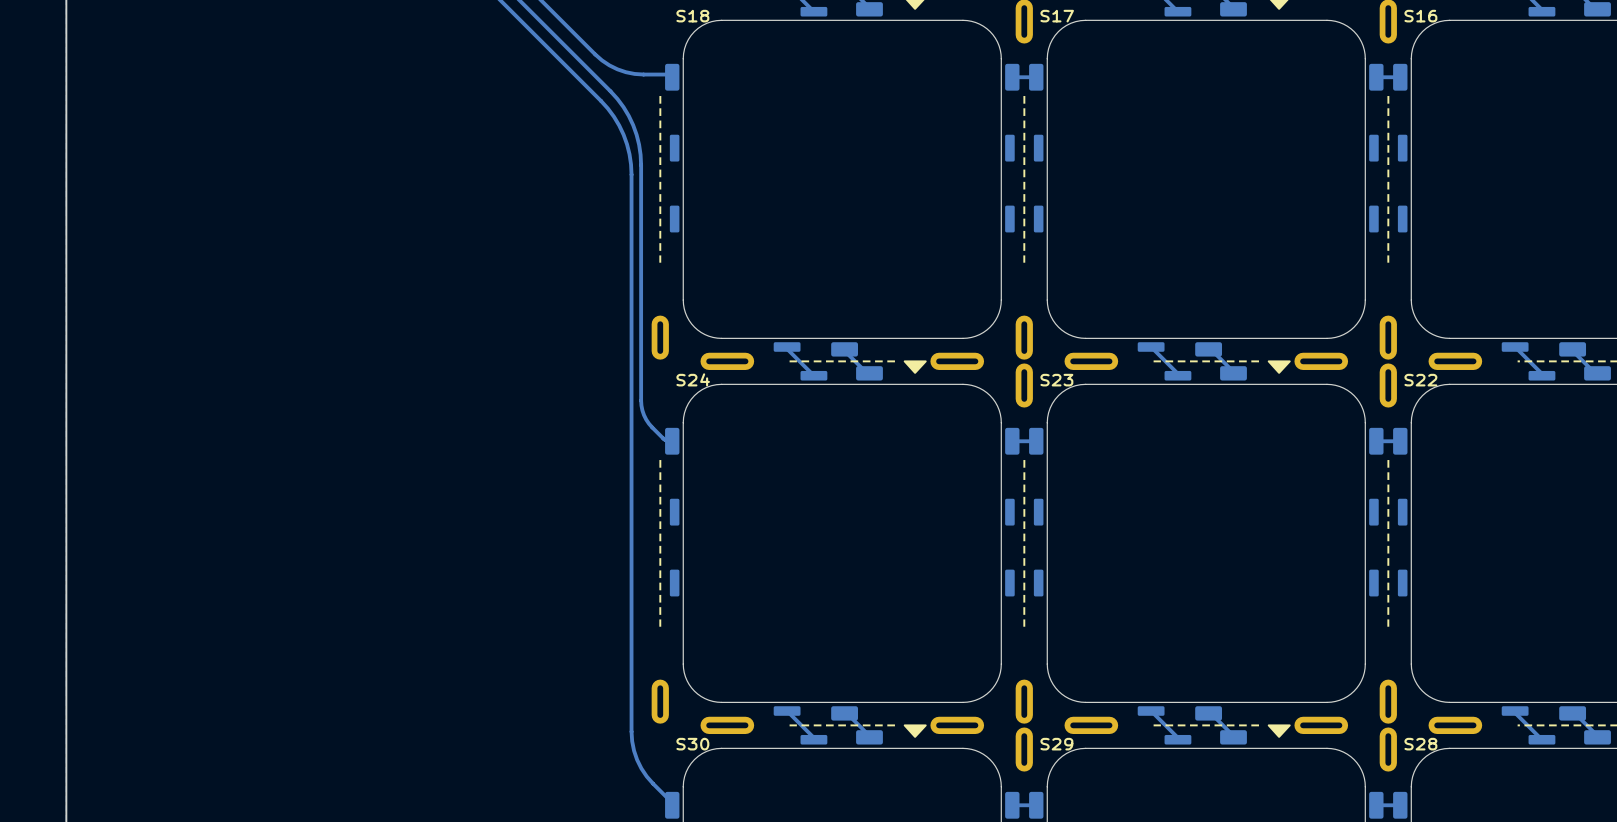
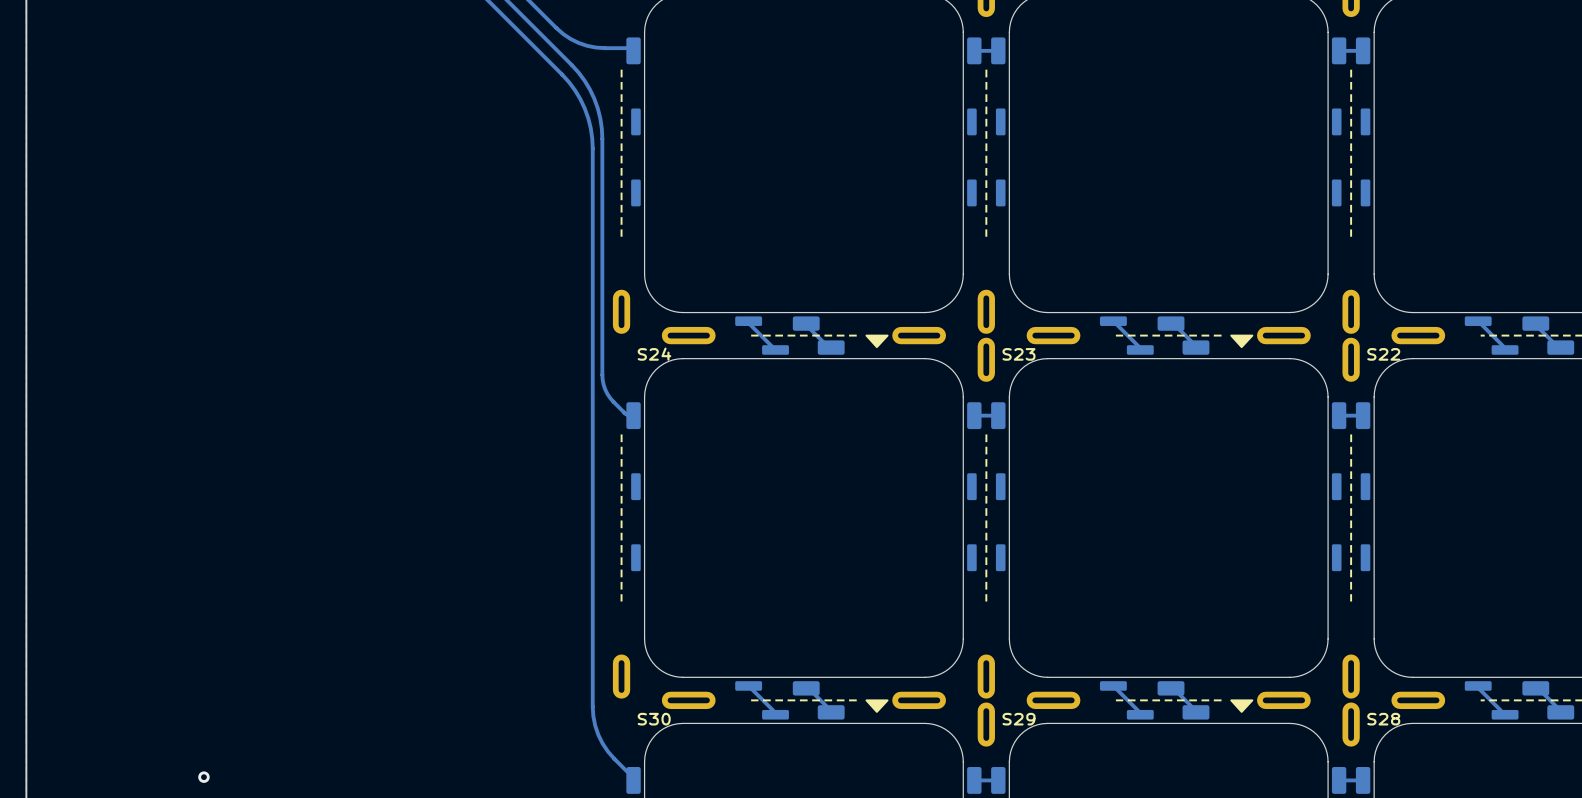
via: none -> (203, 777)

